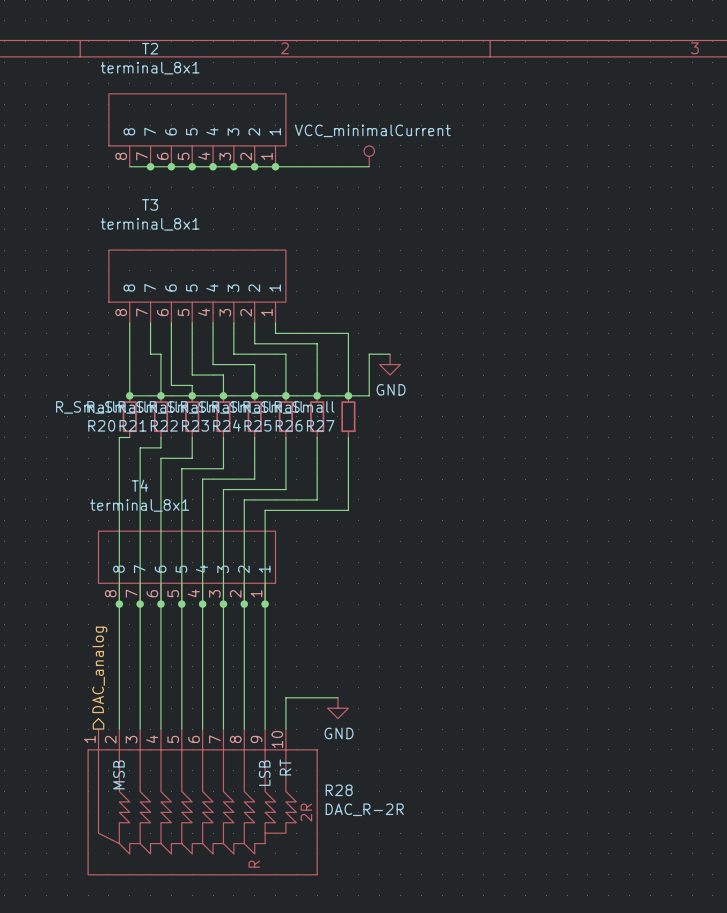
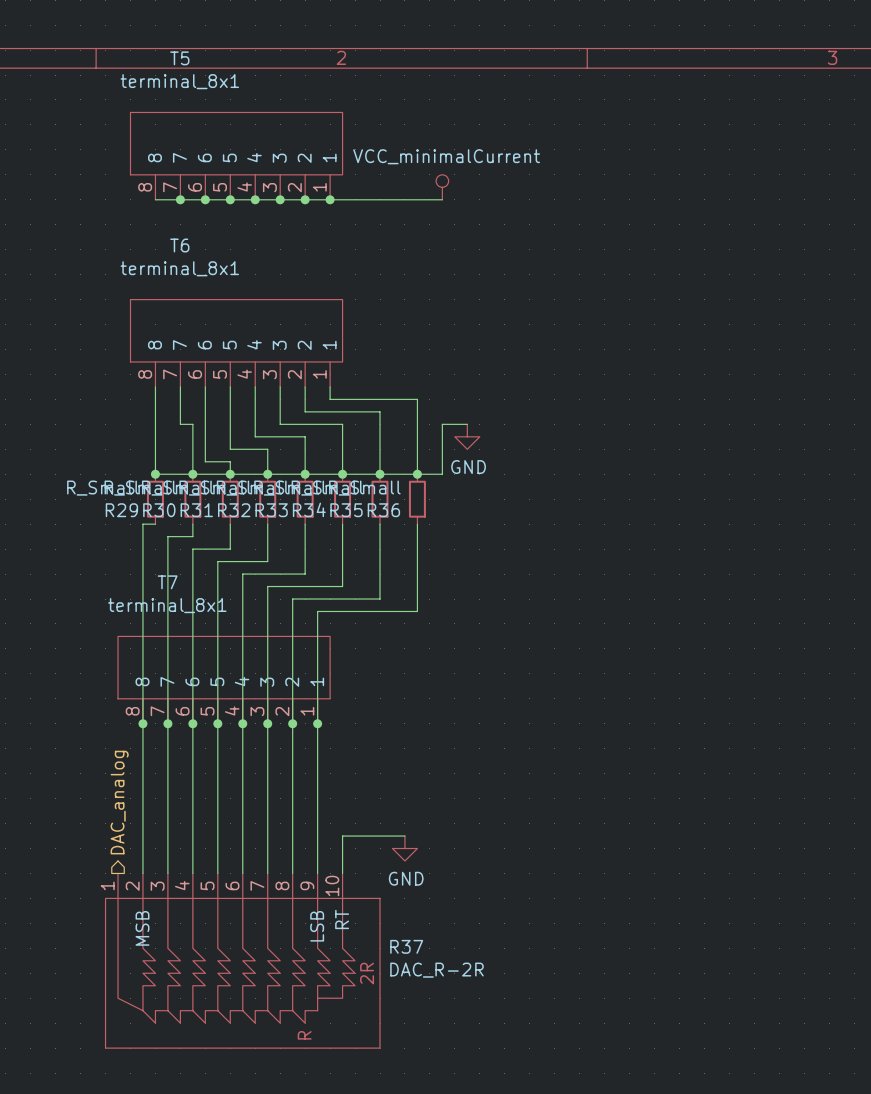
T2 name: T2 (150, 48) -> T5 (179, 58)
T3 name: T3 (150, 204) -> T6 (179, 245)
R20 name: R20 (101, 425) -> R29 (121, 510)
R21 name: R21 (132, 425) -> R30 (159, 510)
R22 name: R22 (164, 425) -> R31 (196, 510)
R23 name: R23 (195, 425) -> R32 (234, 510)
R24 name: R24 (226, 425) -> R33 (271, 510)
R25 name: R25 (257, 425) -> R34 (309, 509)
R26 name: R26 (289, 425) -> R35 (346, 510)
R27 name: R27 (320, 425) -> R36 (383, 510)
T4 name: T4 (139, 485) -> T7 (167, 582)
R28 name: R28 (339, 790) -> R37 (406, 946)

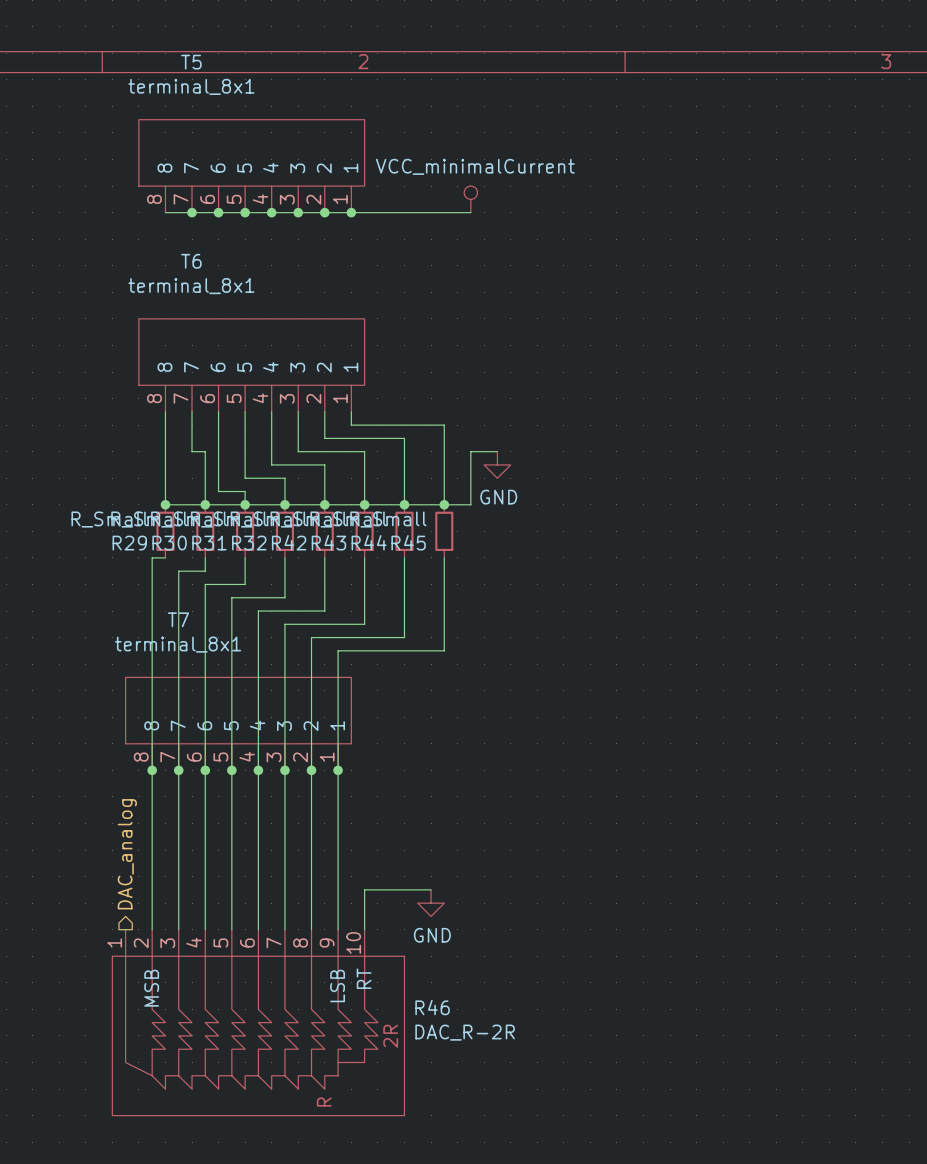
R34 name: R34 (309, 509) -> R43 (328, 542)
R33 name: R33 (271, 510) -> R42 (289, 542)
R35 name: R35 (346, 510) -> R44 (369, 542)
R36 name: R36 (383, 510) -> R45 (408, 542)
R37 name: R37 (406, 946) -> R46 (432, 1007)

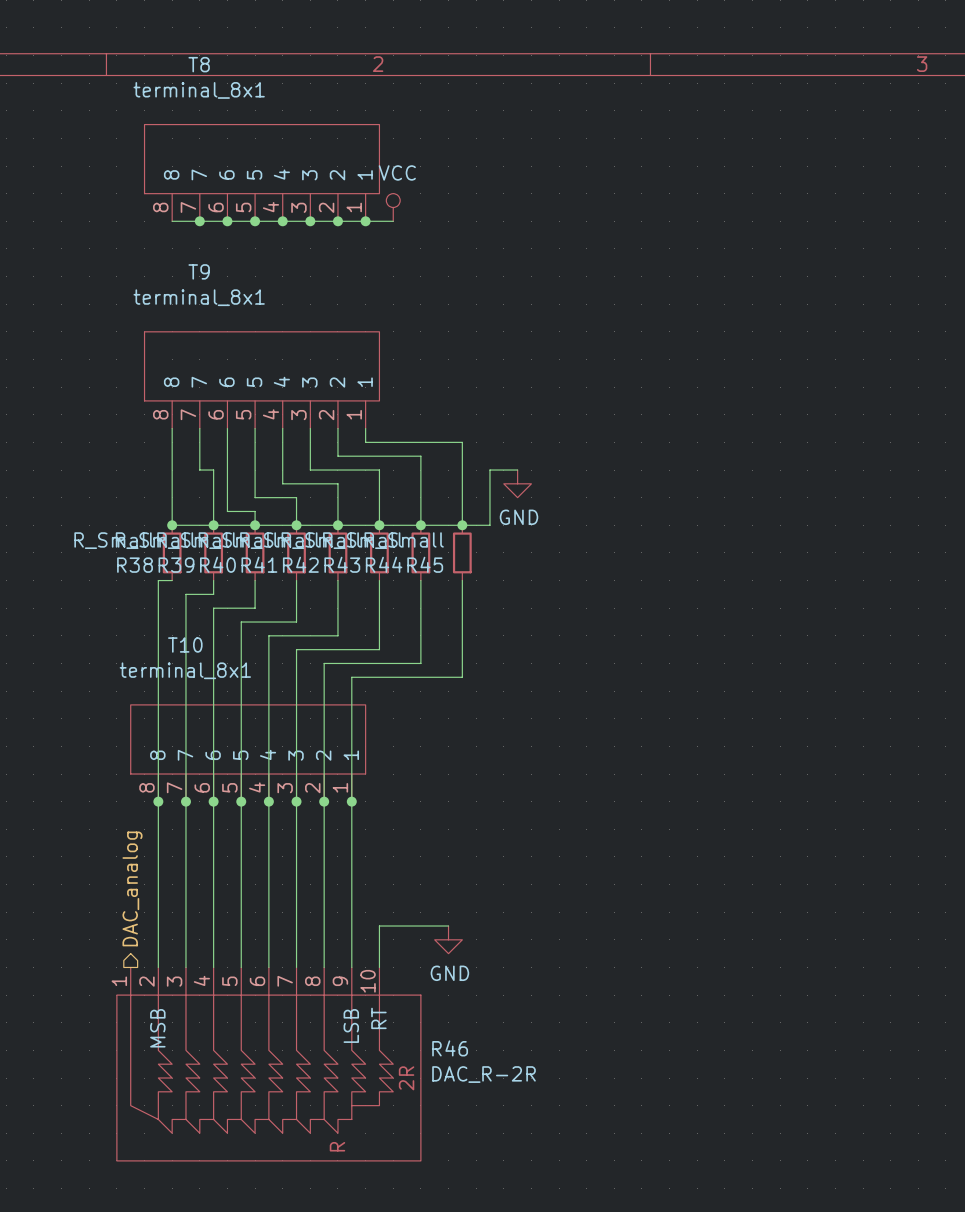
T5 name: T5 (191, 62) -> T8 (199, 64)
power symbol: none -> VCC (393, 207)
power symbol: VCC_minimalCurrent (470, 199) -> none
wire: (377, 212) (470, 212) -> none
T6 name: T6 (191, 261) -> T9 (199, 271)
R29 name: R29 (129, 543) -> R38 (135, 565)
R30 name: R30 (169, 543) -> R39 (176, 565)
R31 name: R31 (209, 543) -> R40 (217, 564)
R32 name: R32 (249, 543) -> R41 (259, 564)
T7 name: T7 (178, 619) -> T10 (185, 644)

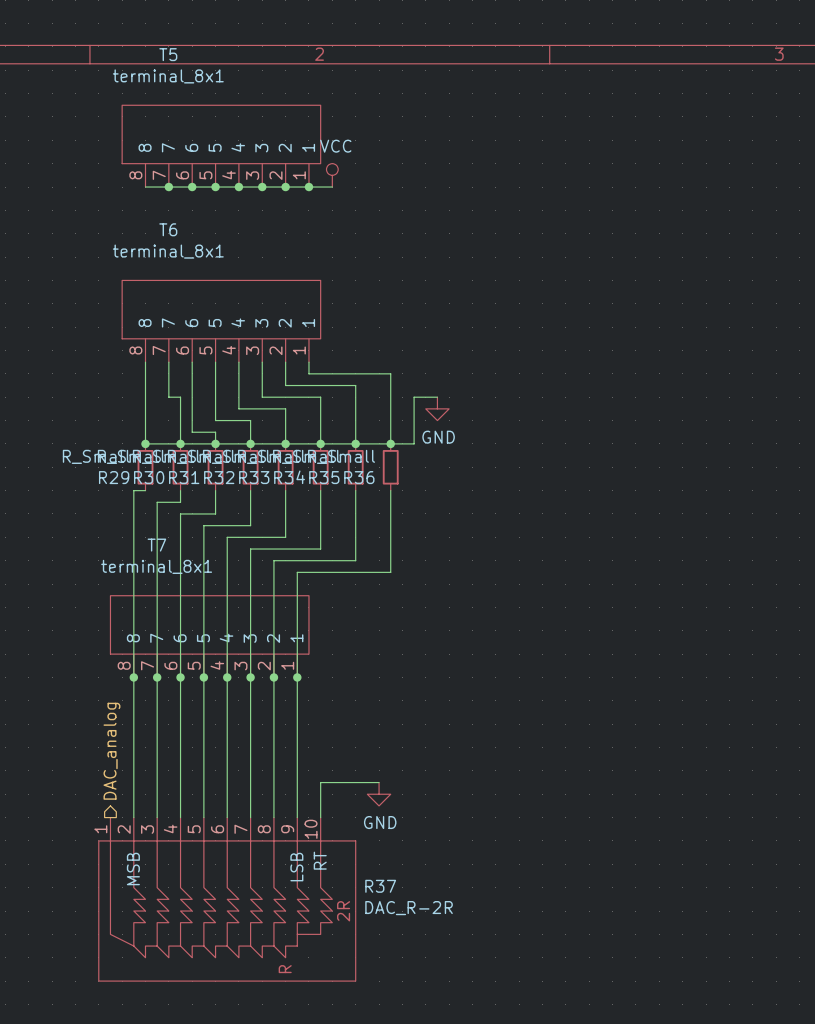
T8 name: T8 (199, 64) -> T5 (168, 54)
T9 name: T9 (199, 271) -> T6 (168, 229)
R40 name: R40 (217, 564) -> R31 (184, 477)
R41 name: R41 (259, 564) -> R32 (219, 477)
R42 name: R42 (300, 564) -> R33 (254, 477)
R43 name: R43 (342, 564) -> R34 (289, 477)
R44 name: R44 (384, 564) -> R35 (324, 477)
R45 name: R45 (425, 564) -> R36 (359, 477)
R38 name: R38 (135, 565) -> R29 (114, 477)
R39 name: R39 (176, 565) -> R30 (149, 477)
T10 name: T10 (185, 644) -> T7 (156, 545)
R46 name: R46 (450, 1048) -> R37 (380, 886)

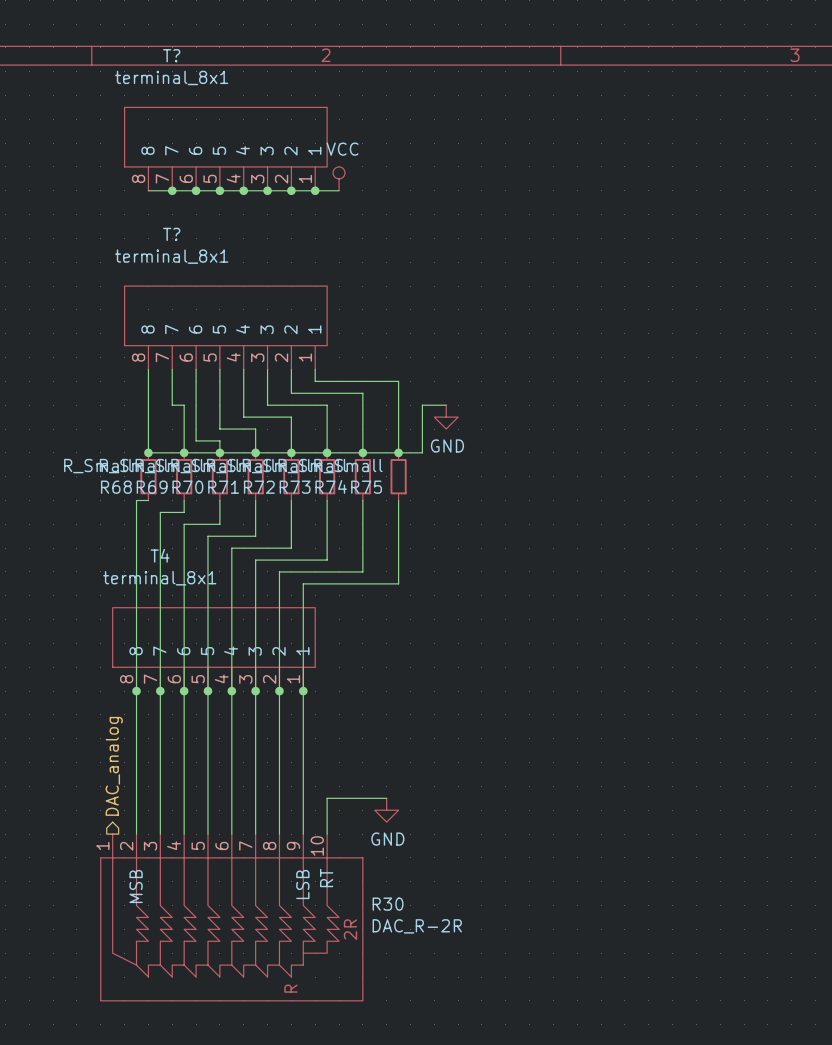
T5 name: T5 (168, 54) -> T? (171, 55)
T6 name: T6 (168, 229) -> T? (171, 234)
R29 name: R29 (114, 477) -> R68 (116, 487)
R30 name: R30 (149, 477) -> R69 (152, 487)
R31 name: R31 (184, 477) -> R70 (187, 487)
R32 name: R32 (219, 477) -> R71 (223, 487)
R33 name: R33 (254, 477) -> R72 (259, 487)
R34 name: R34 (289, 477) -> R73 (295, 487)
R35 name: R35 (324, 477) -> R74 (331, 486)
R36 name: R36 (359, 477) -> R75 (366, 487)
T7 name: T7 (156, 545) -> T4 (160, 555)
R37 name: R37 (380, 886) -> R30 (388, 904)

